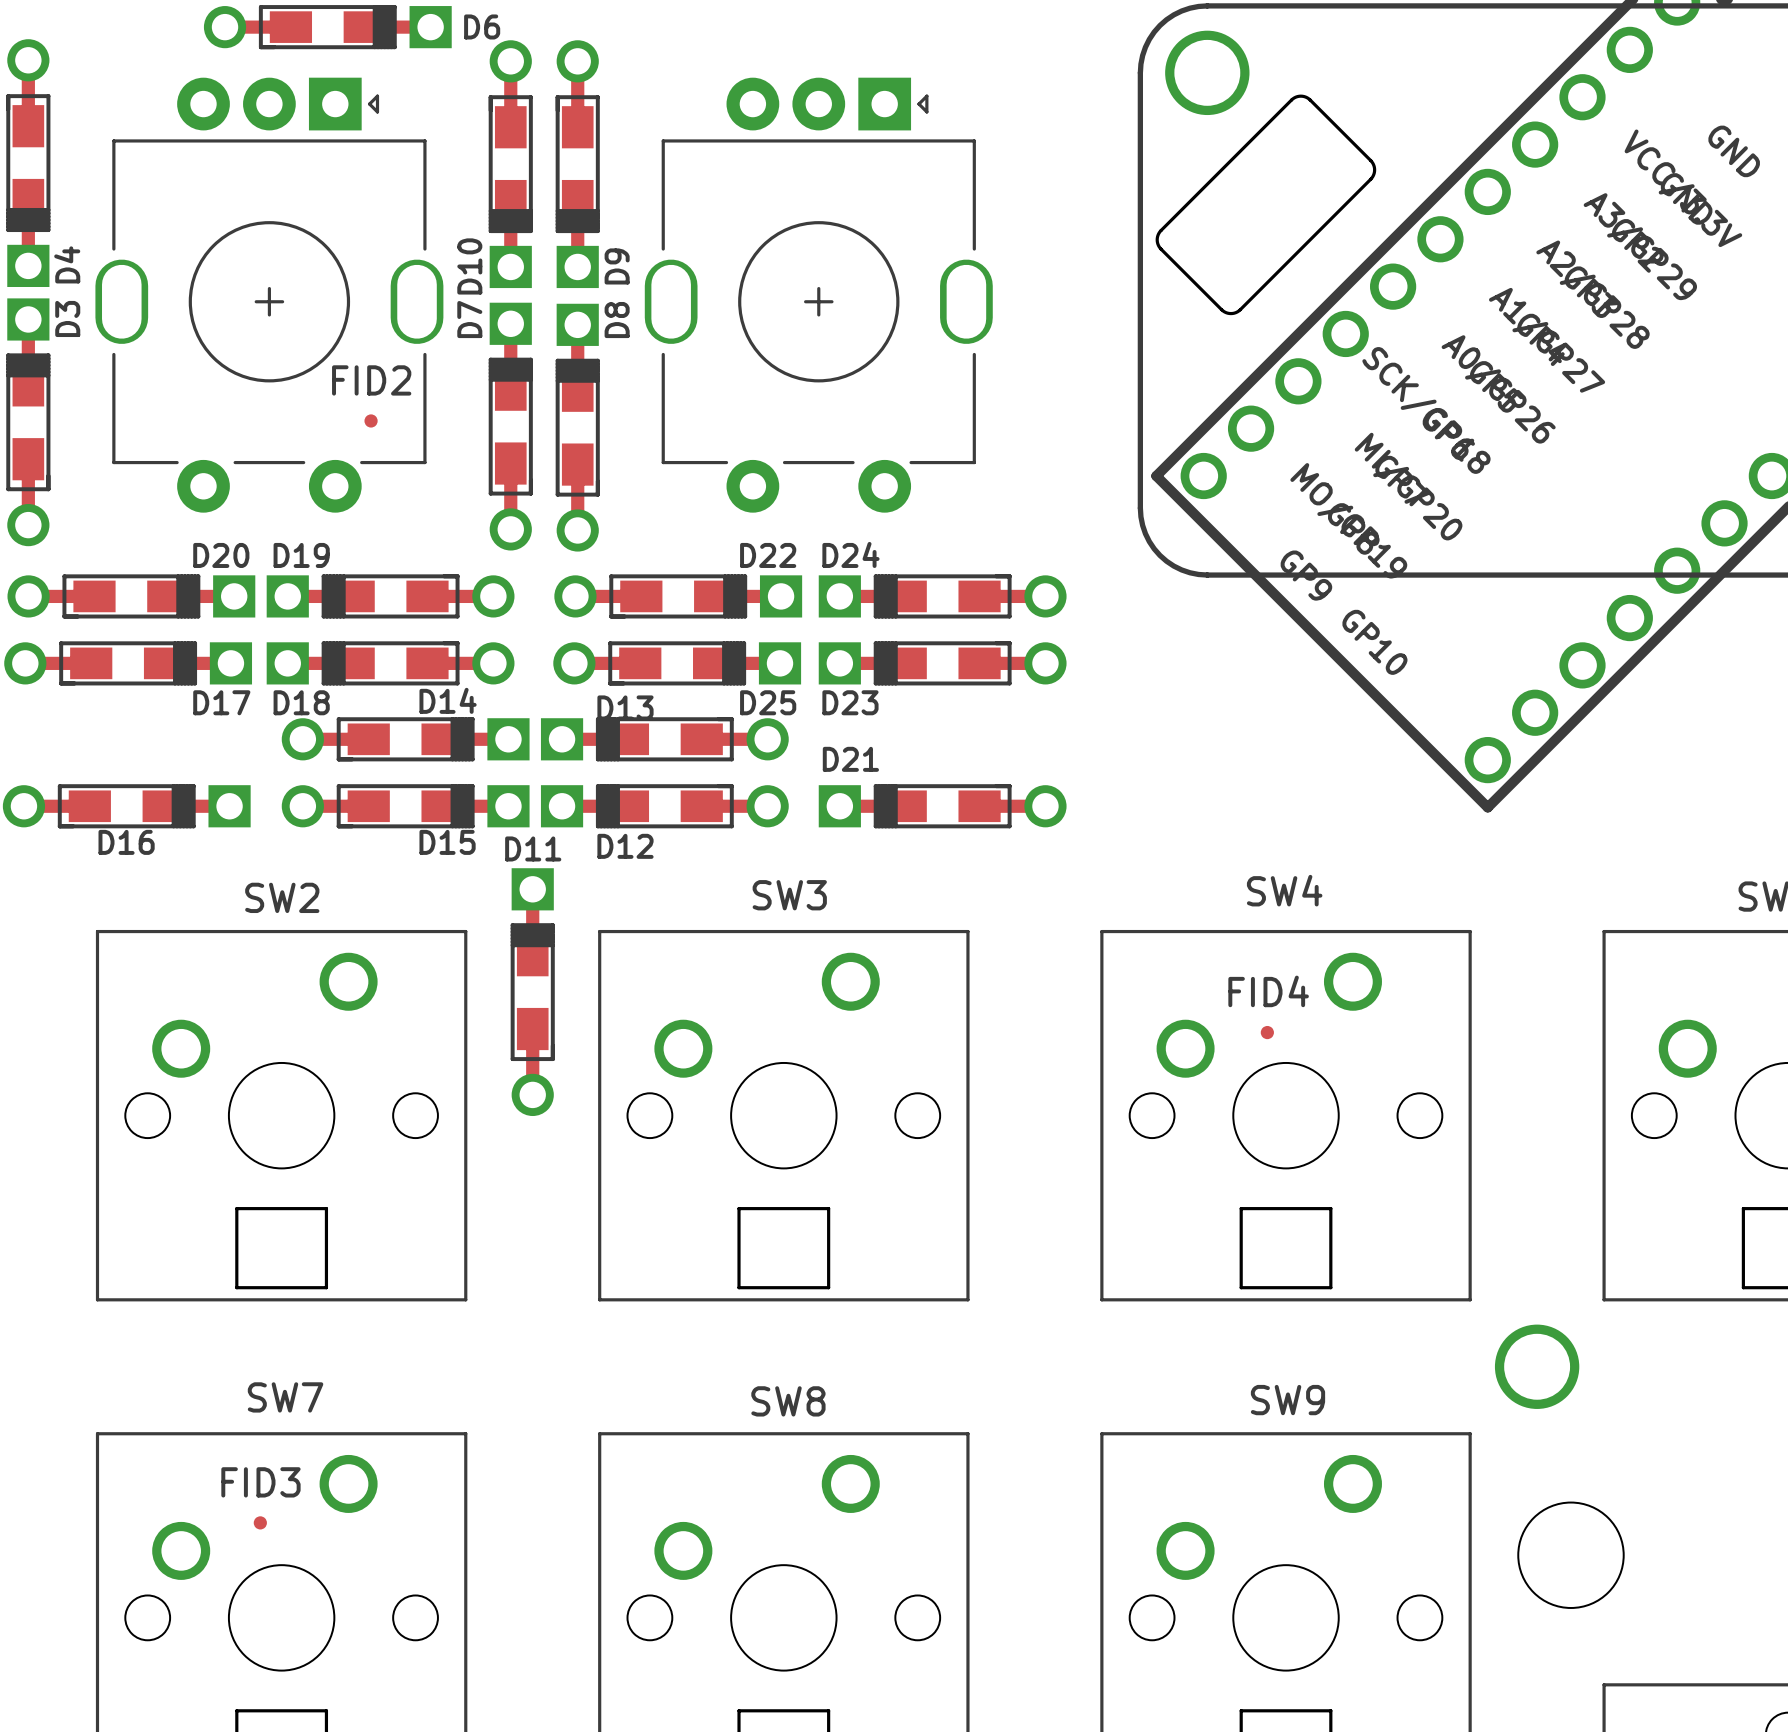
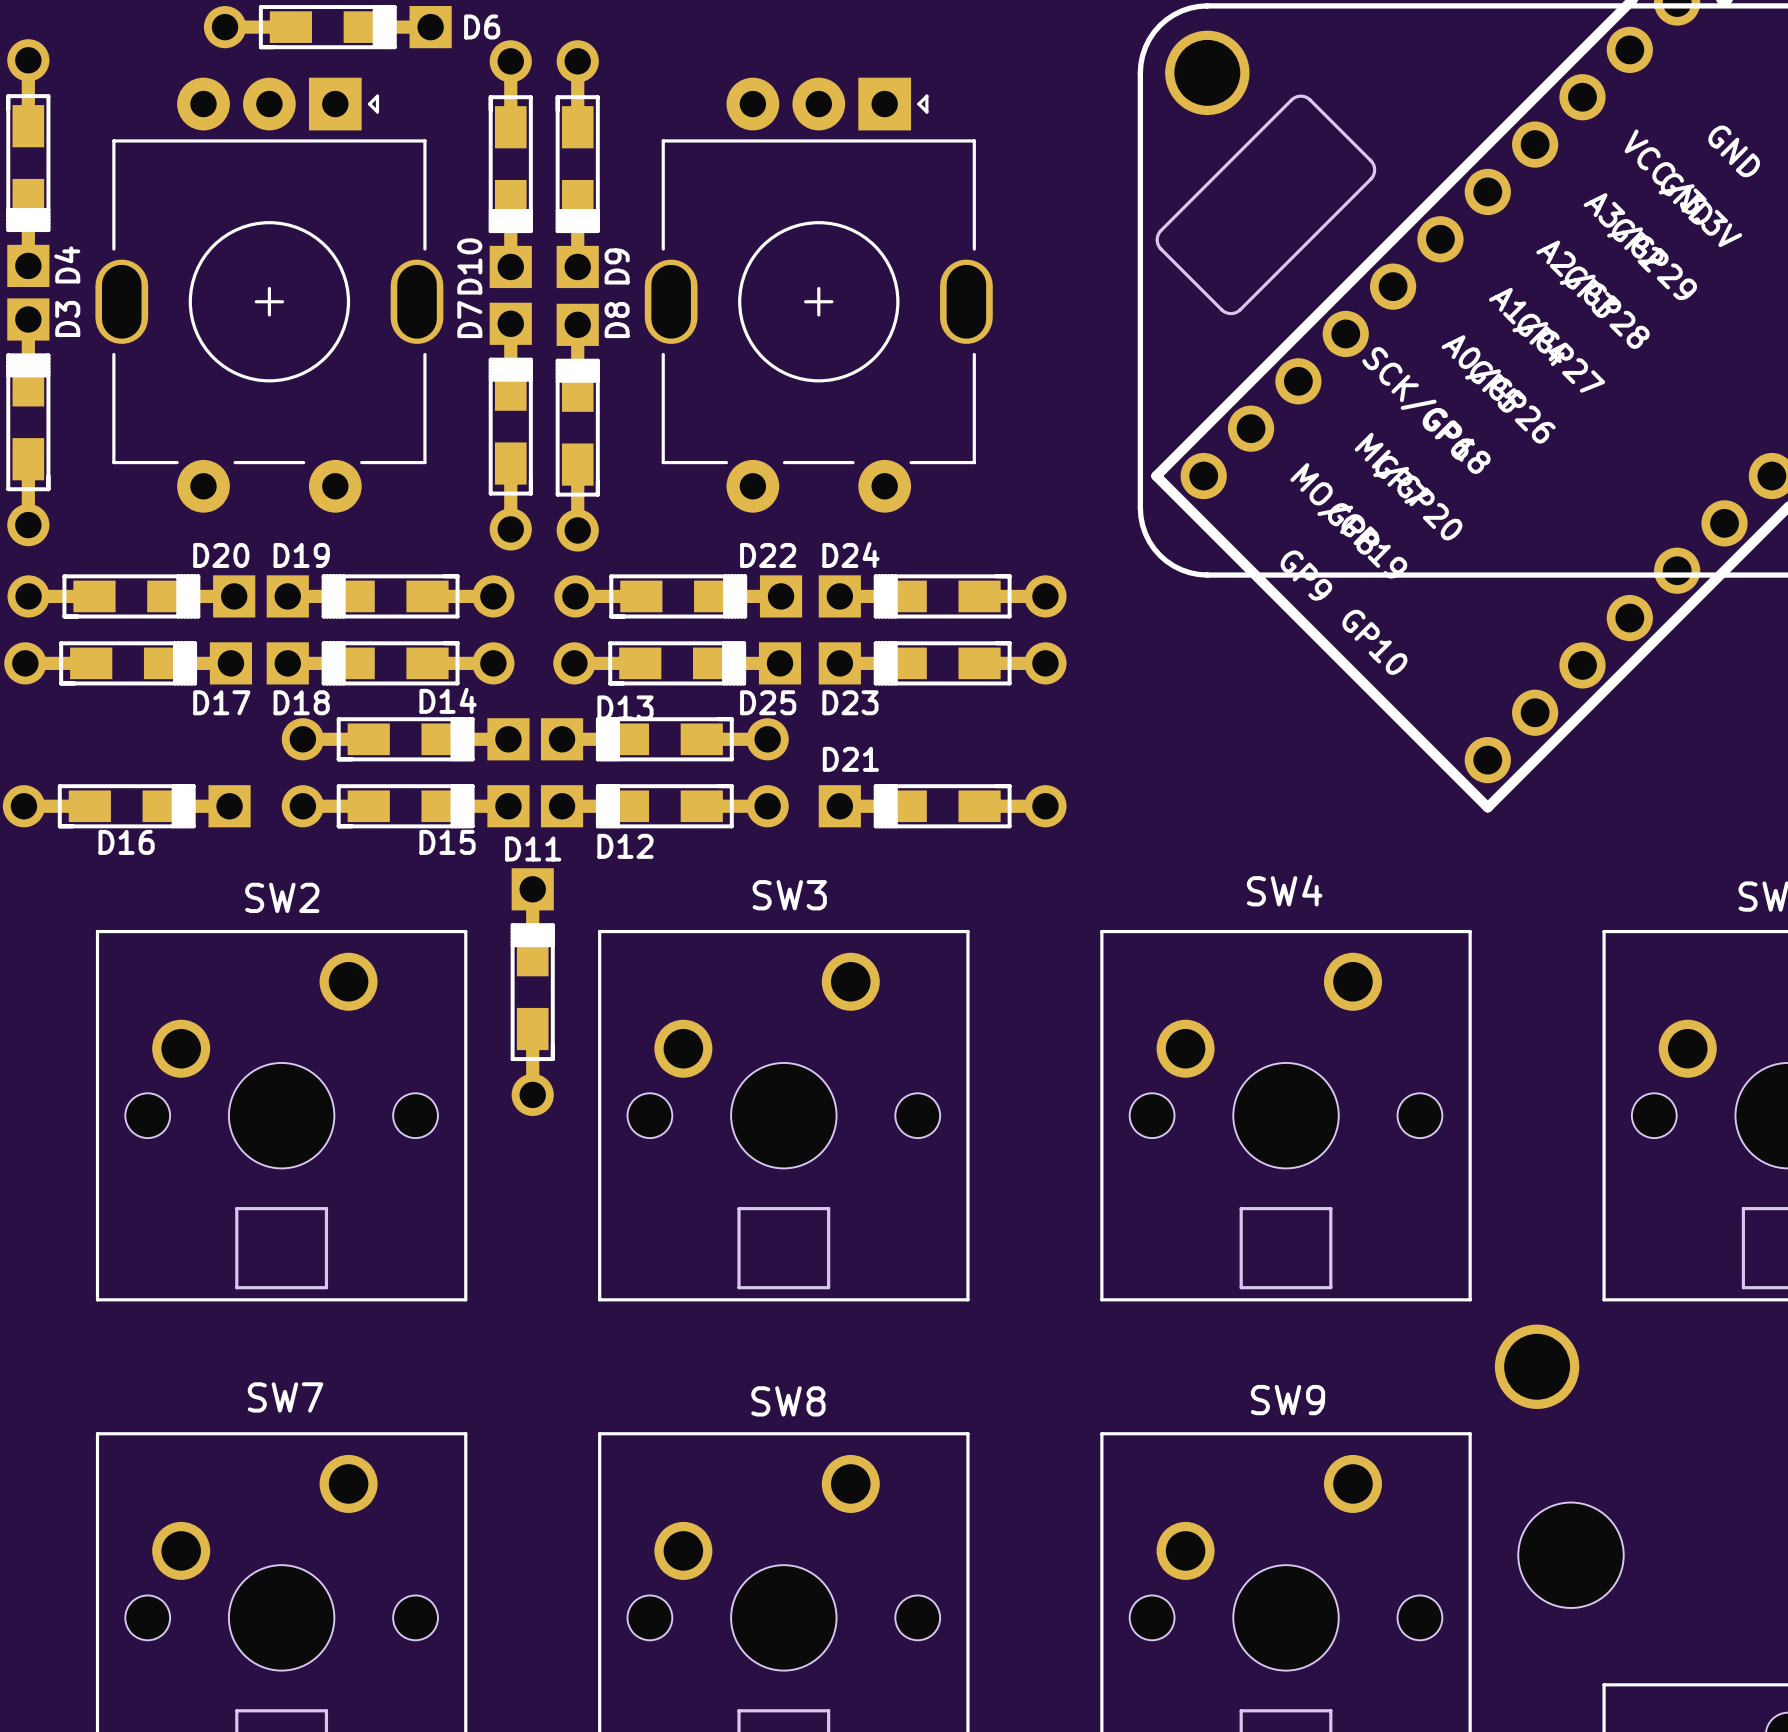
FID2: (371, 420) -> none
FID4: (1267, 1032) -> none
FID3: (260, 1522) -> none

